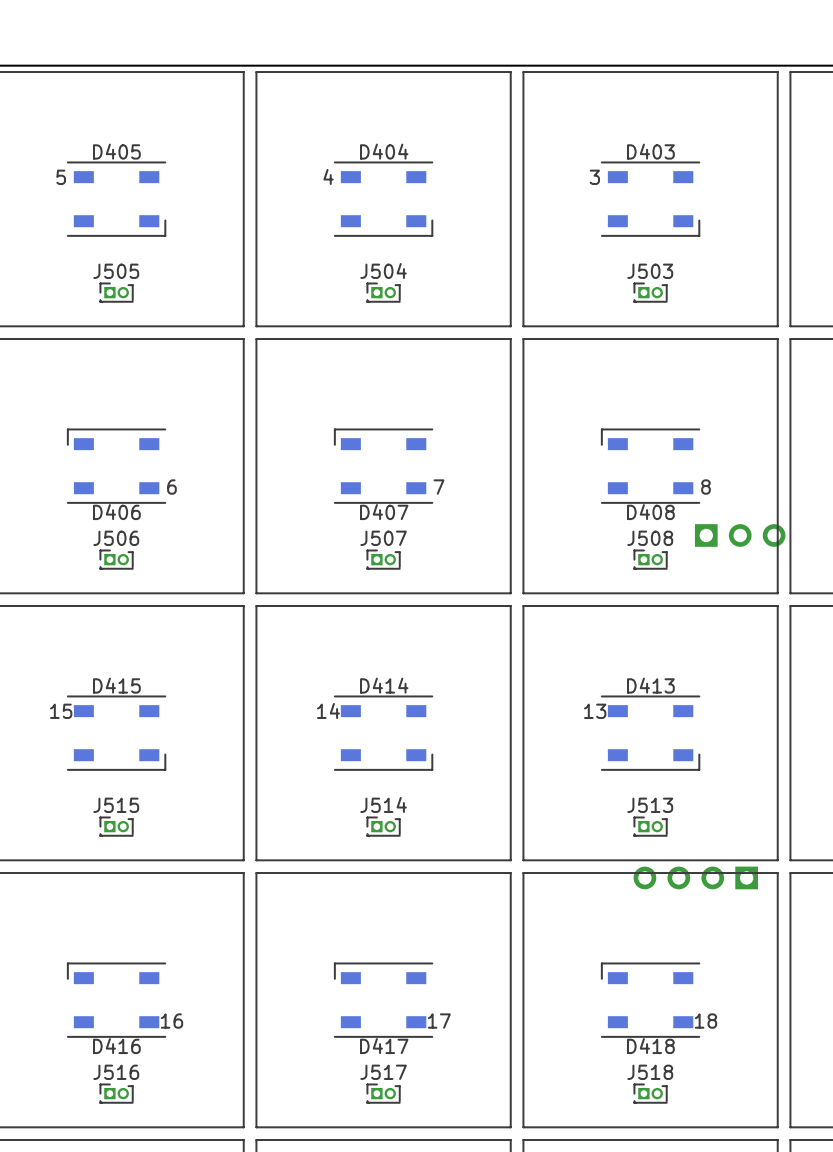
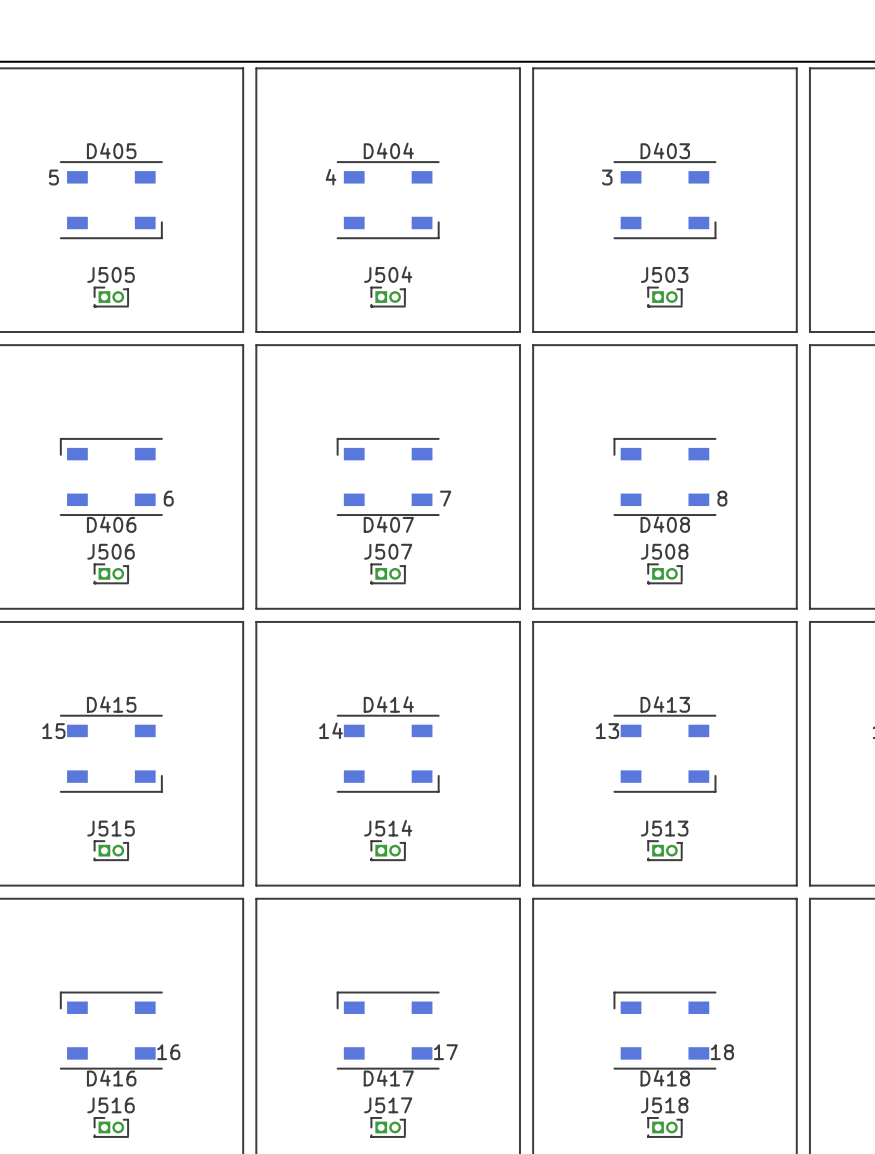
part: (740, 535) -> none
part: (695, 877) -> none

